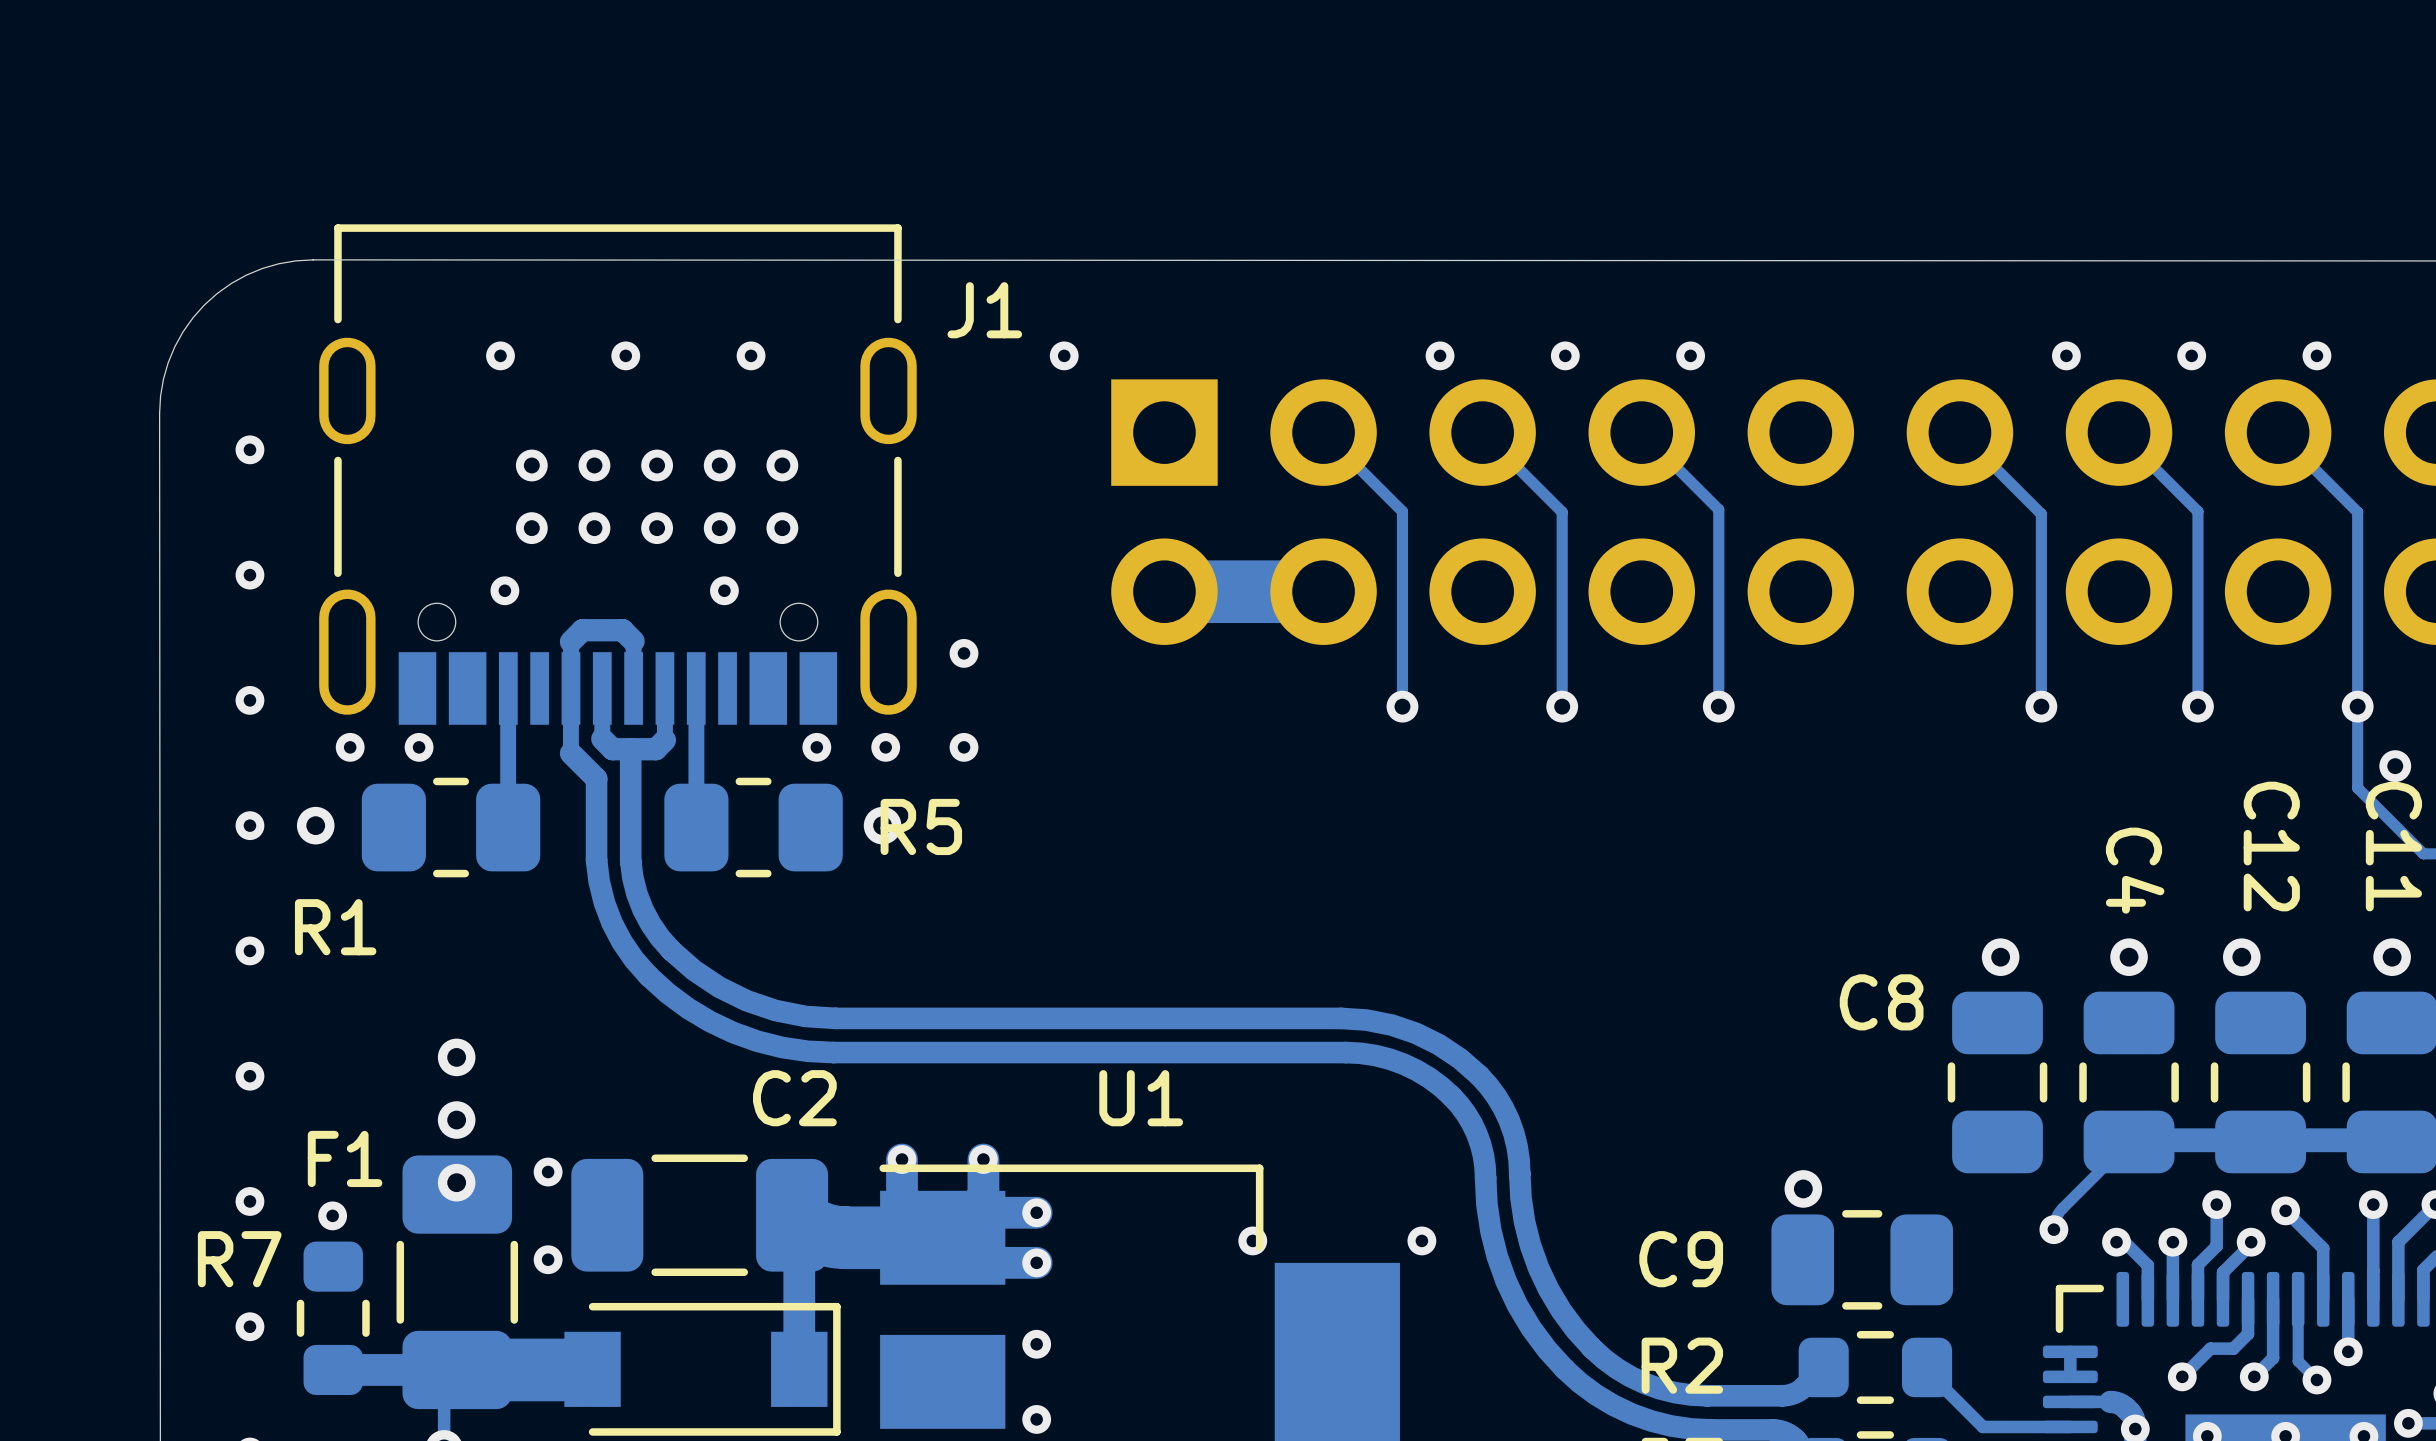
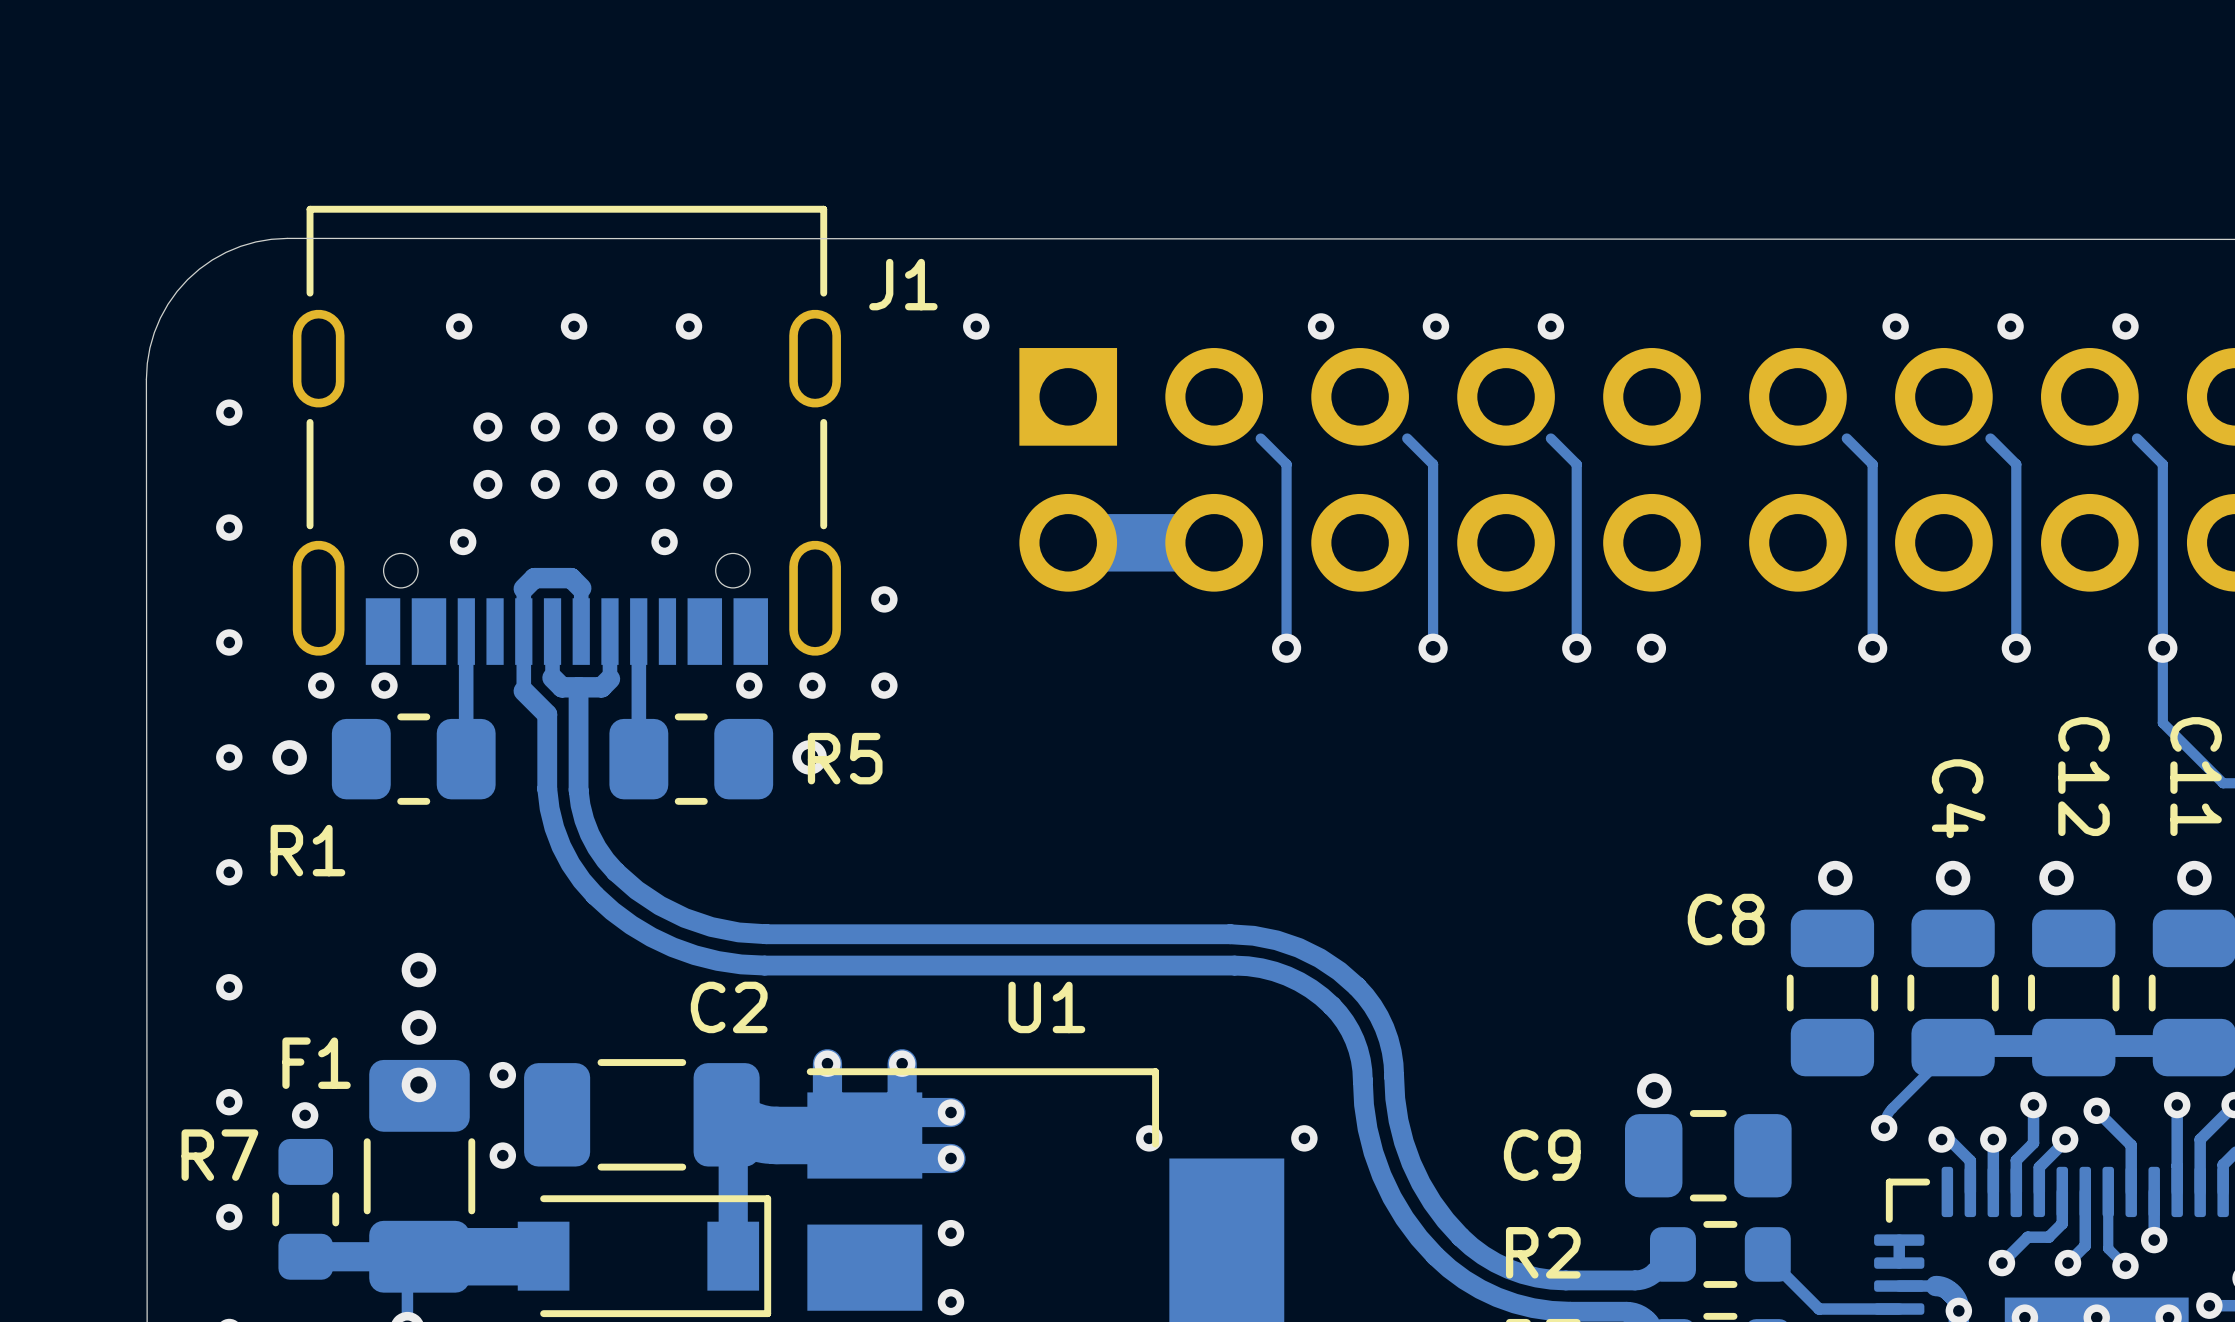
track: (1323, 432) (1402, 511) -> (1260, 438) (1286, 464) (1286, 469)
track: (1482, 432) (1562, 512) -> (1407, 438) (1433, 464) (1433, 469)
track: (1641, 432) (1718, 509) -> (1550, 438) (1576, 464) (1576, 467)
track: (1959, 432) (2041, 514) -> (1846, 438) (1872, 464) (1872, 471)
track: (2119, 432) (2197, 511) -> (1990, 438) (2016, 464) (2016, 469)
track: (2278, 432) (2357, 512) -> (2136, 438) (2162, 464) (2162, 469)
via: none -> (1651, 648)
via: (2395, 766) -> none

